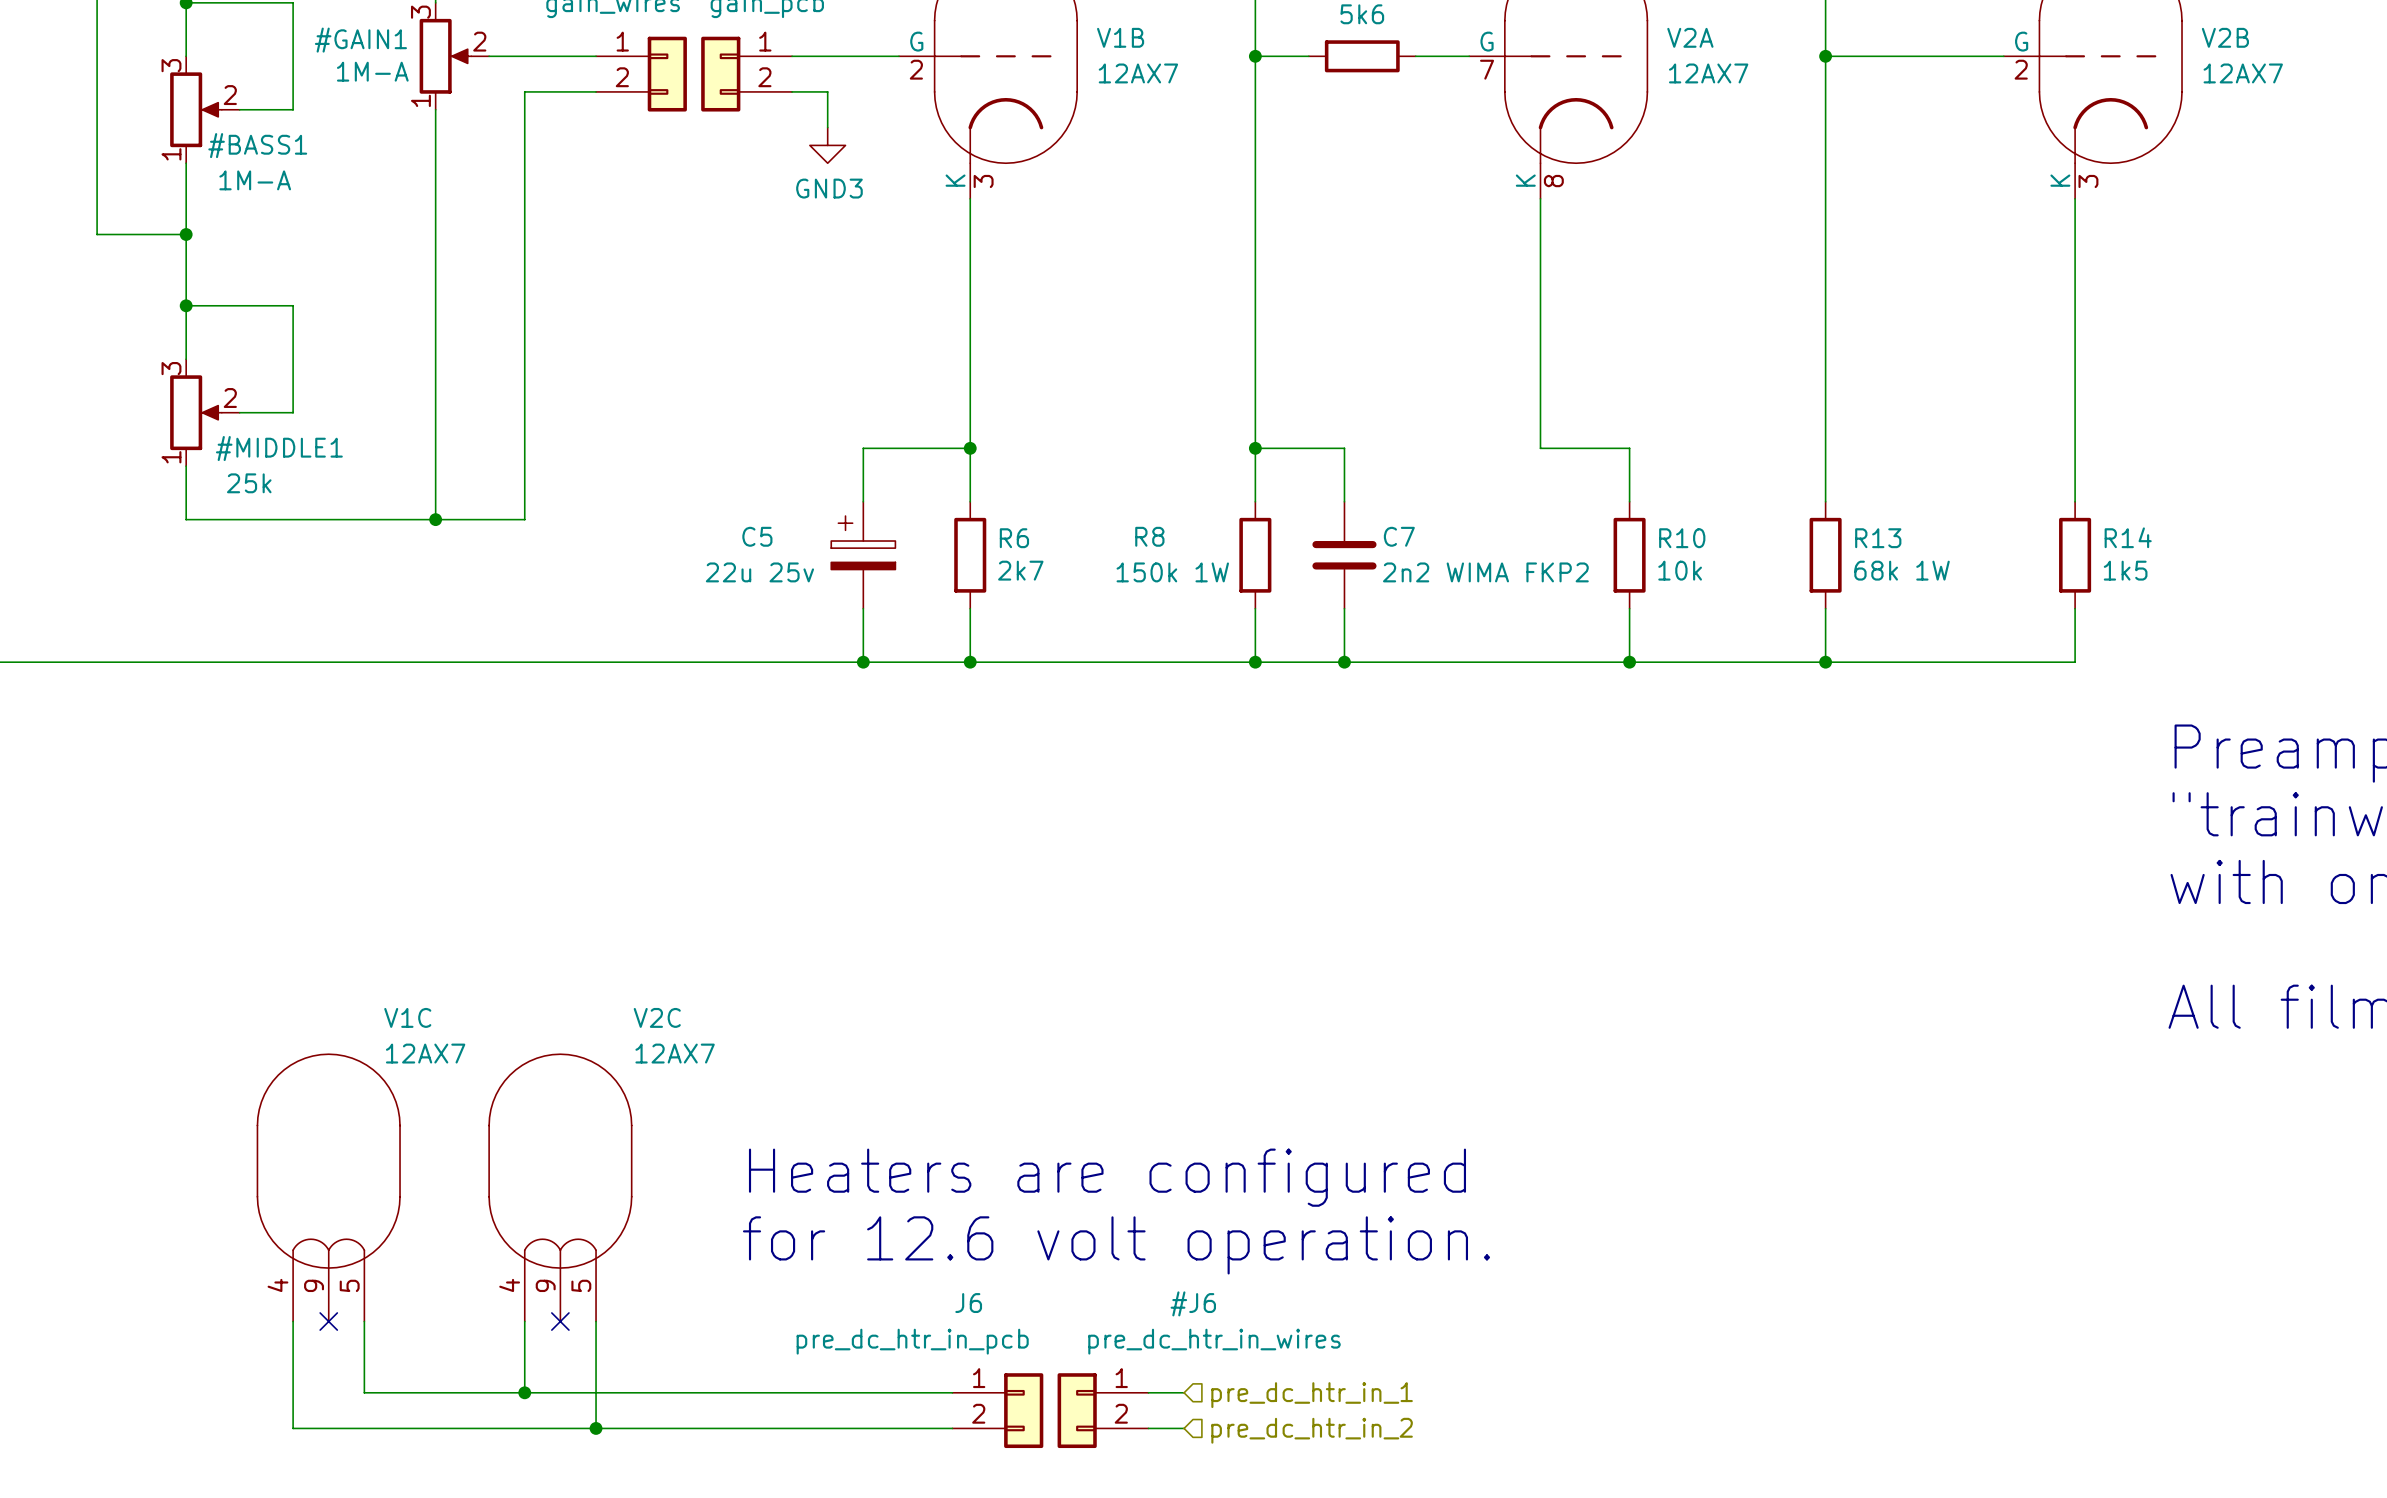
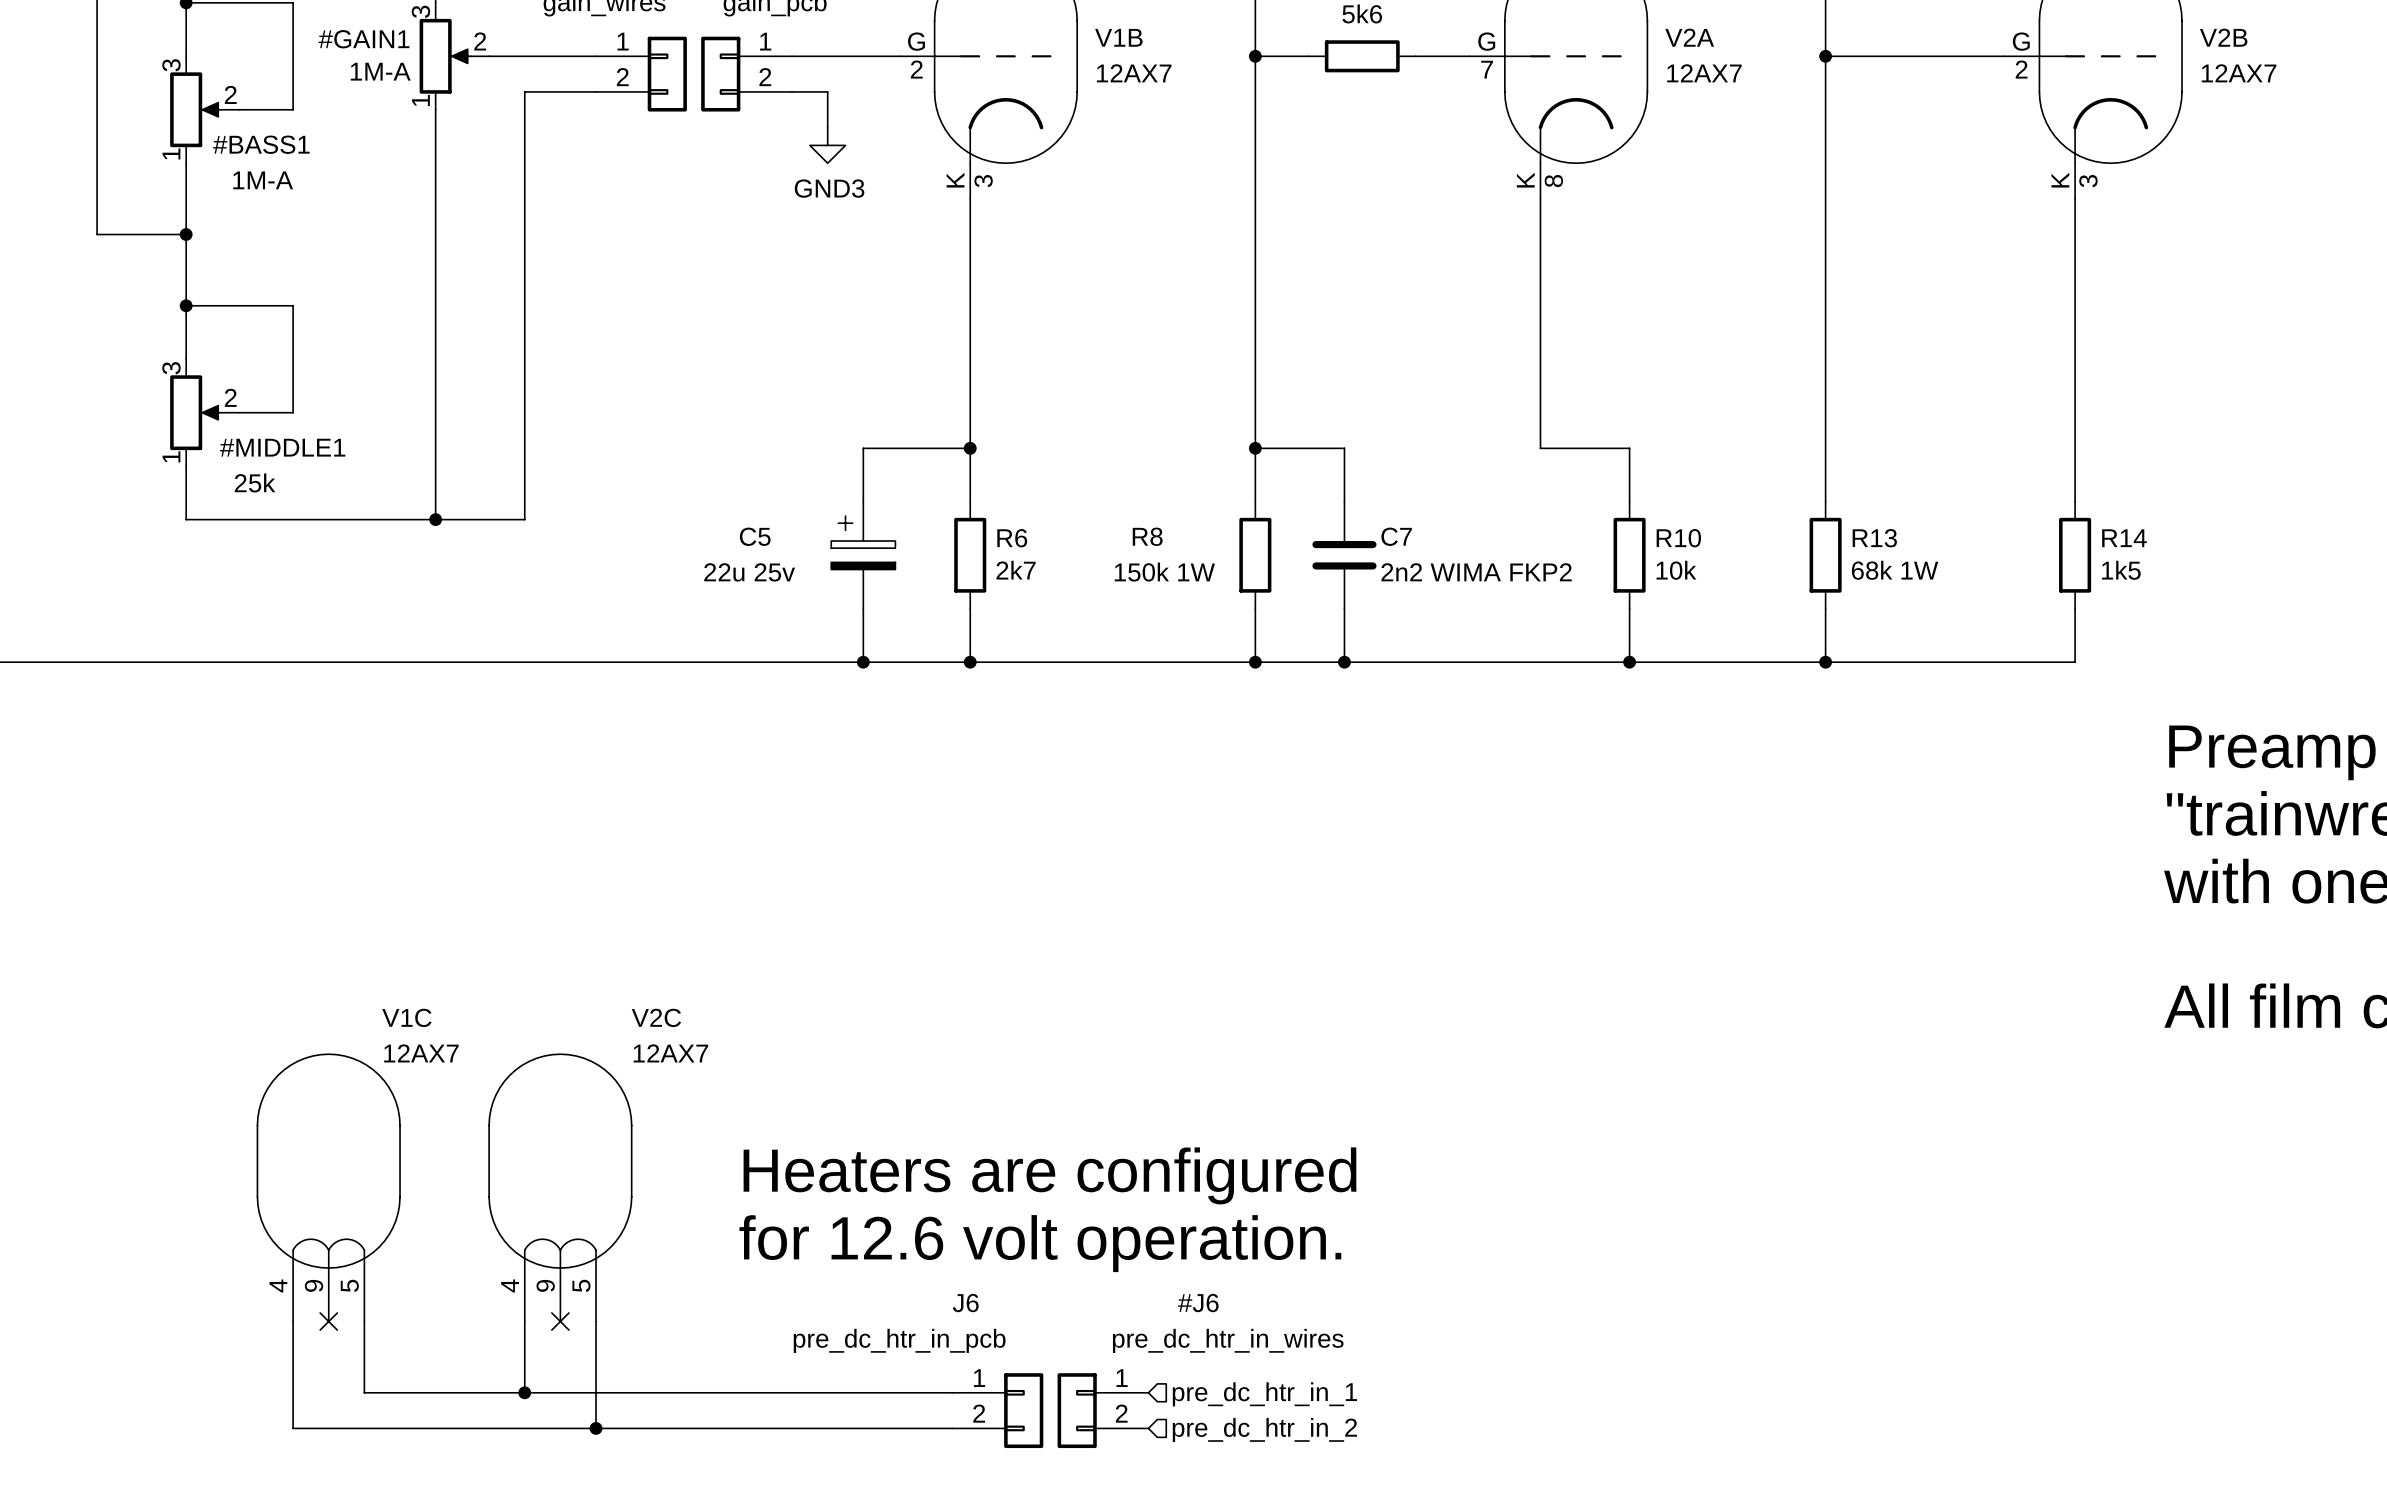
wire: (1148, 1392) (1184, 1392) -> none
hierarchical label position: pre_dc_htr_in_1 (1312, 1395) -> pre_dc_htr_in_1 (1264, 1394)
wire: (1148, 1428) (1184, 1428) -> none
hierarchical label position: pre_dc_htr_in_2 (1312, 1430) -> pre_dc_htr_in_2 (1264, 1429)

